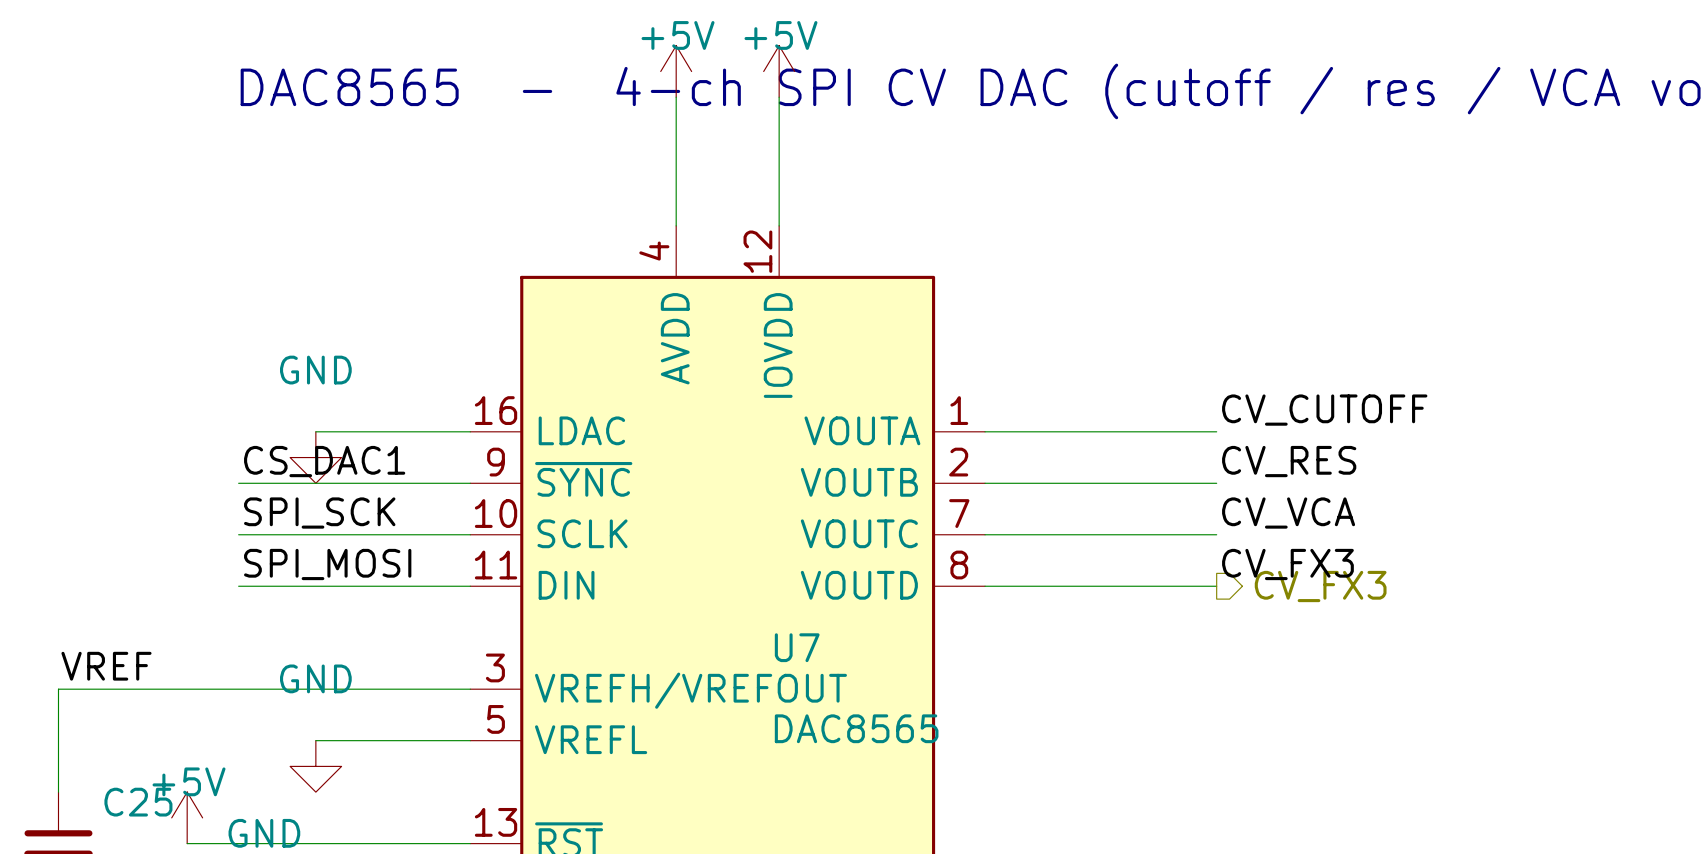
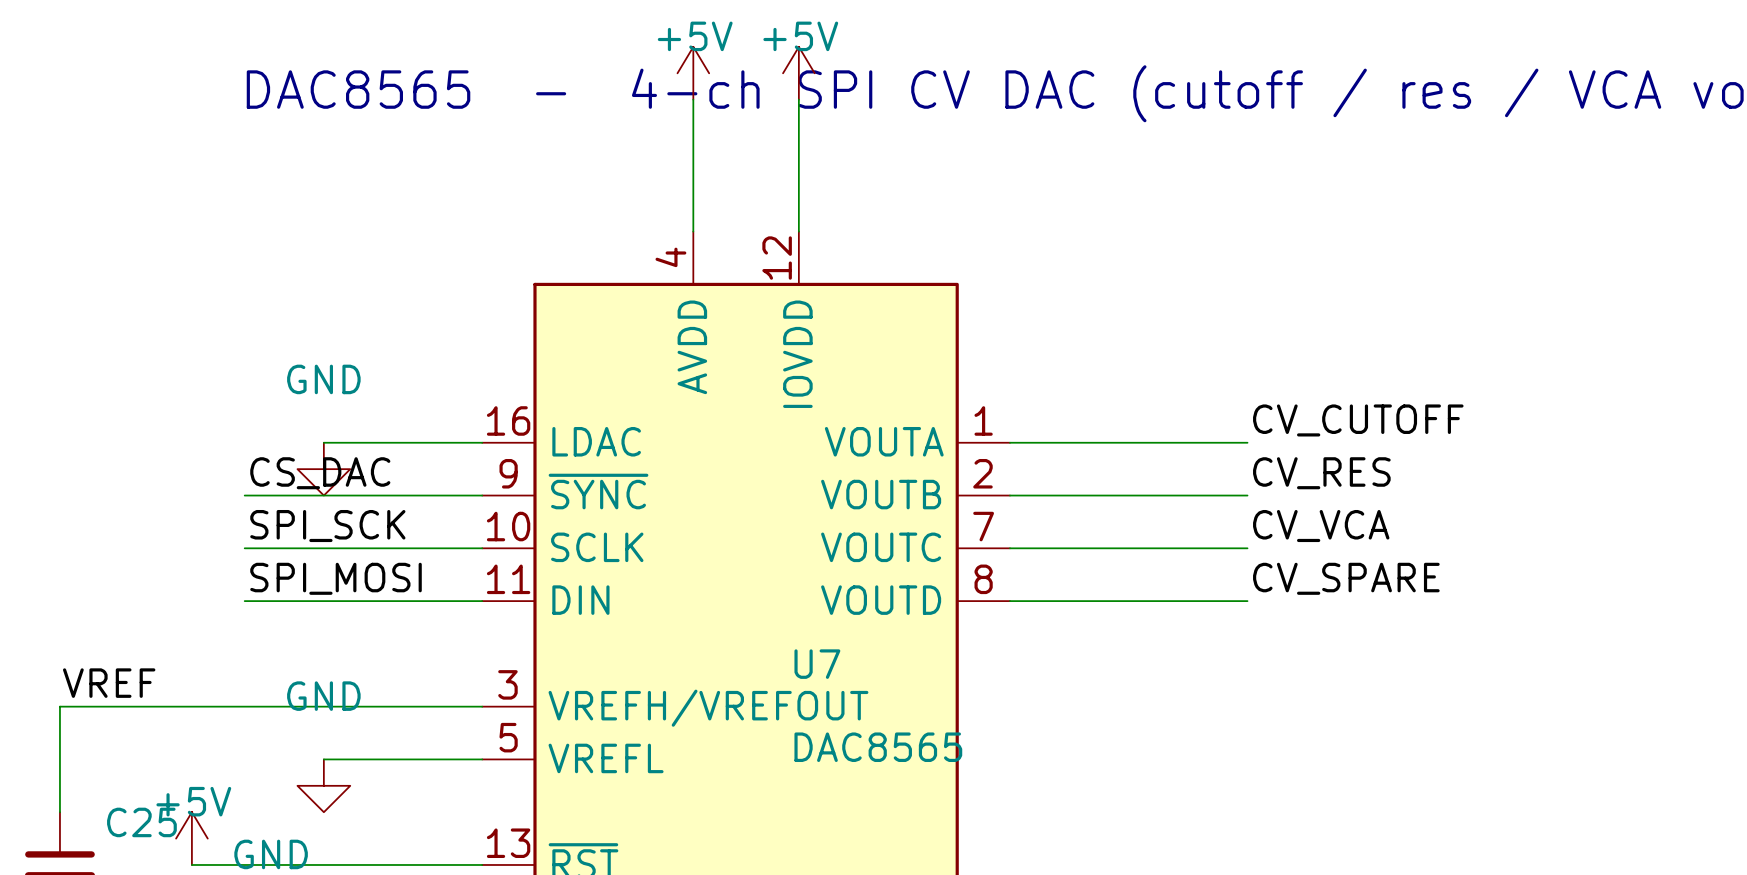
label: CS_DAC1 (324, 461) -> CS_DAC (320, 473)
label: CV_FX3 (1287, 564) -> CV_SPARE (1346, 578)
hierarchical label: CV_FX3 (1320, 586) -> none

